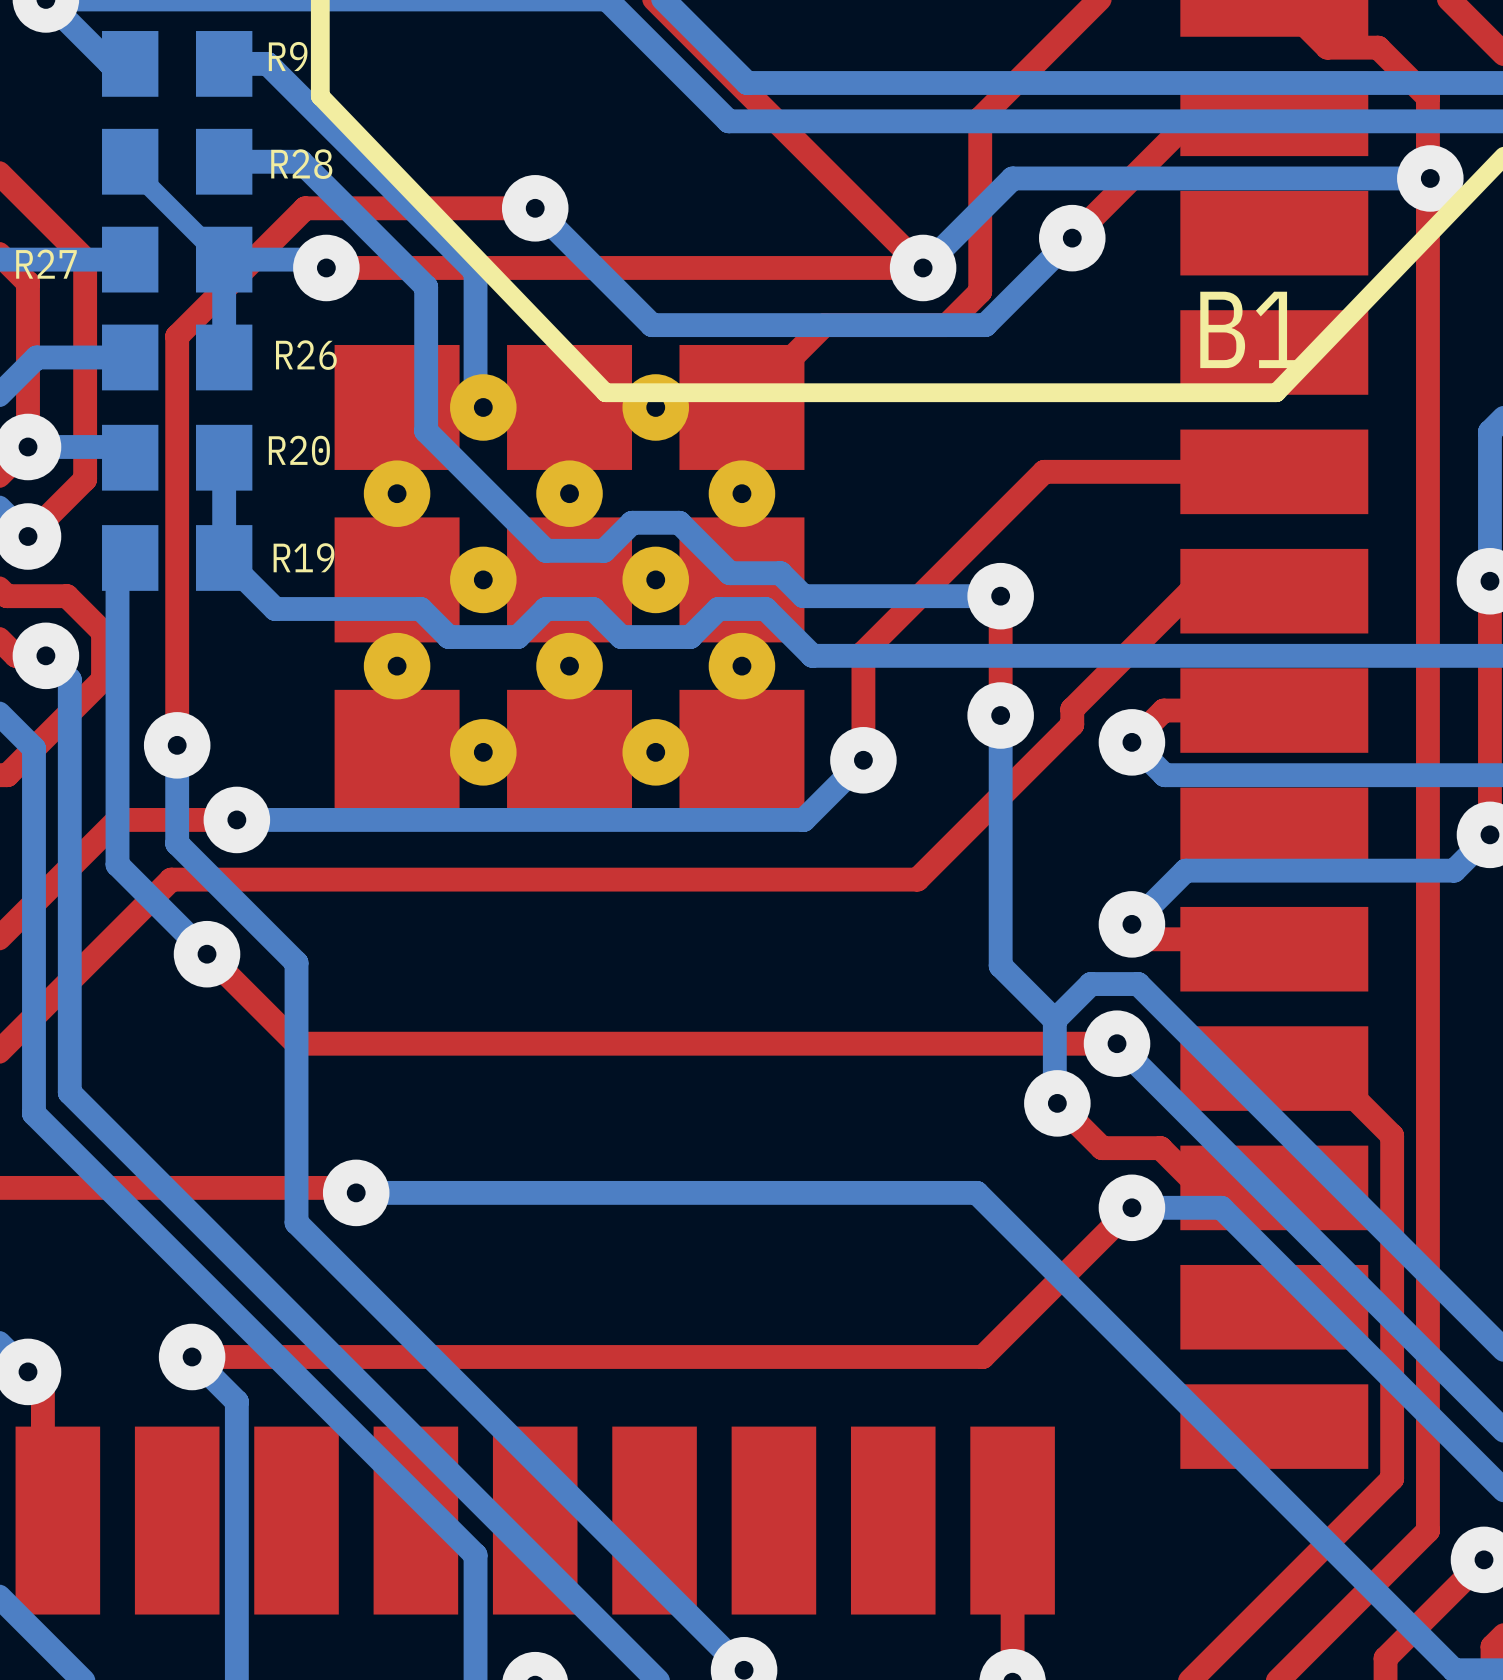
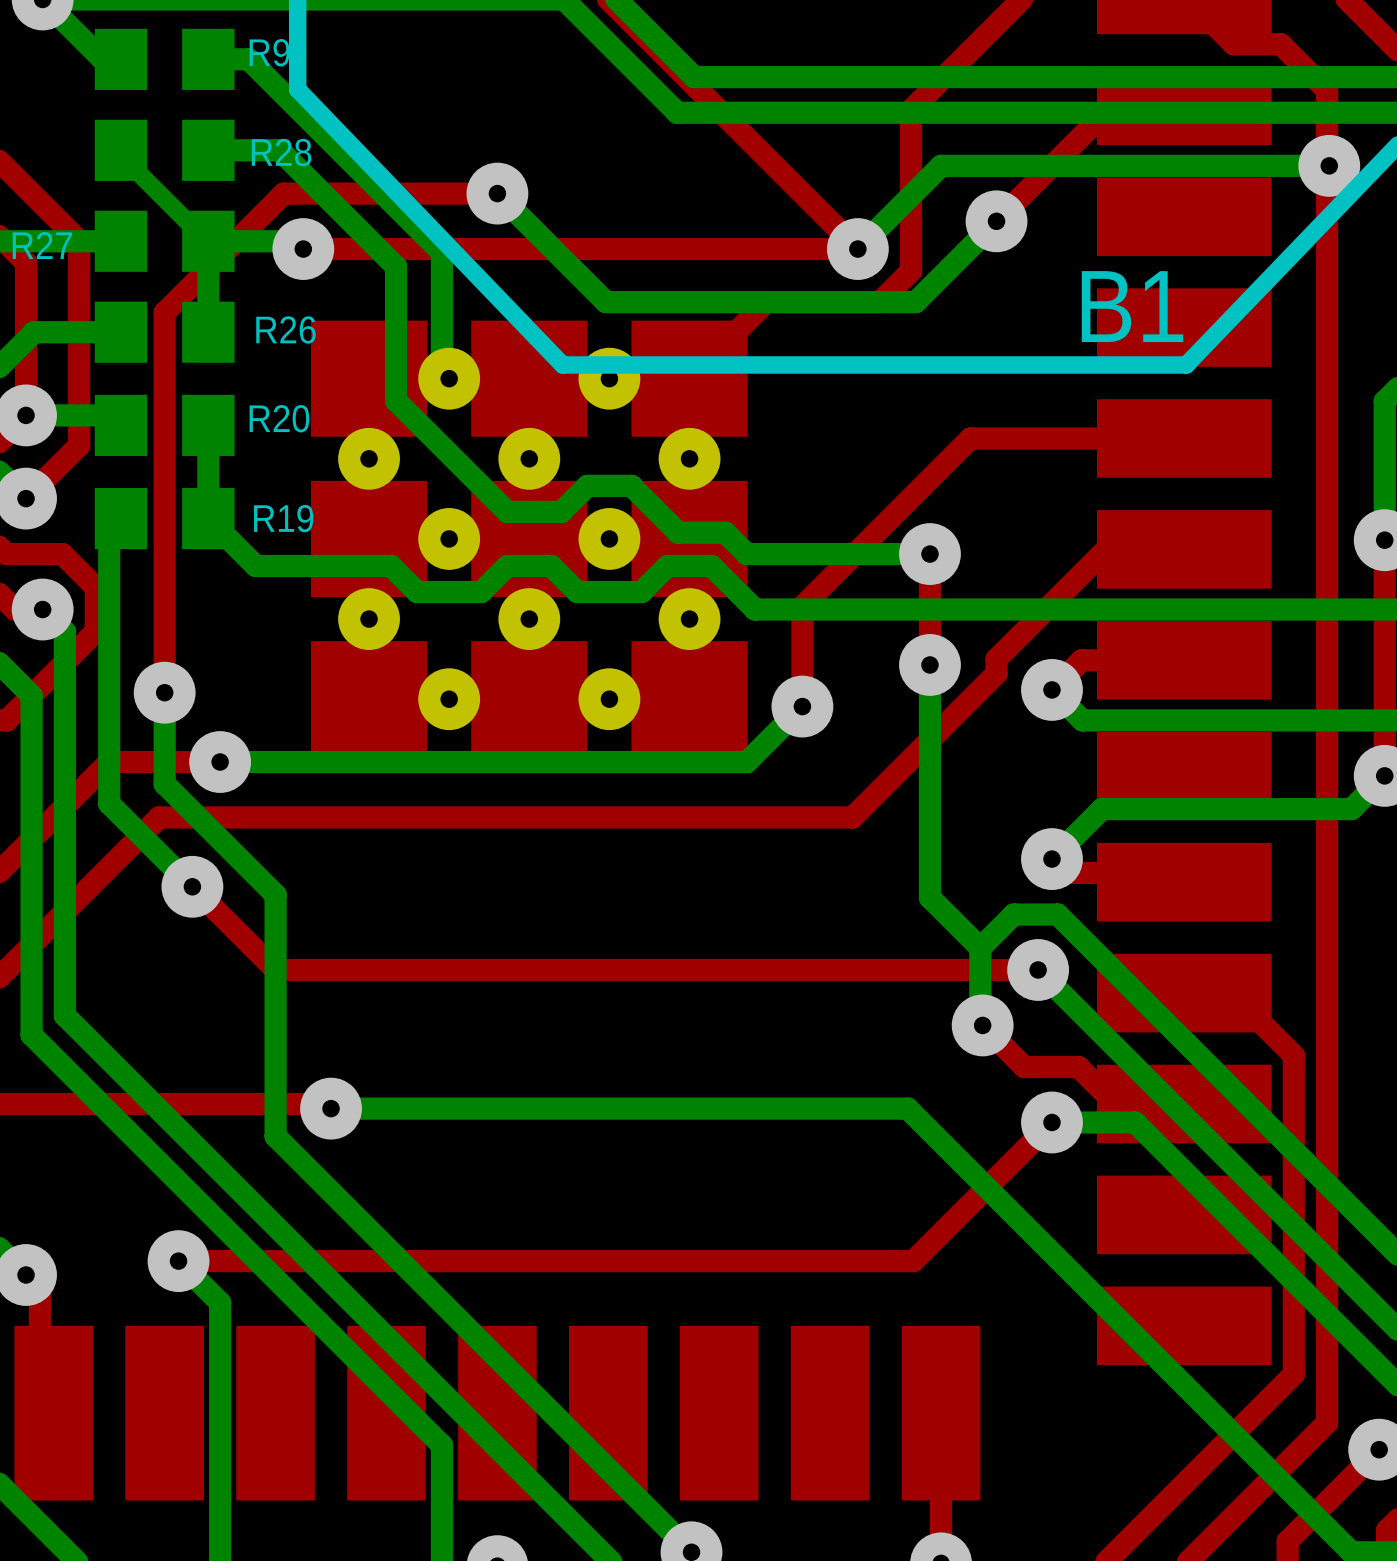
B1 name position: B1 (1252, 329) -> B1 (1132, 306)

